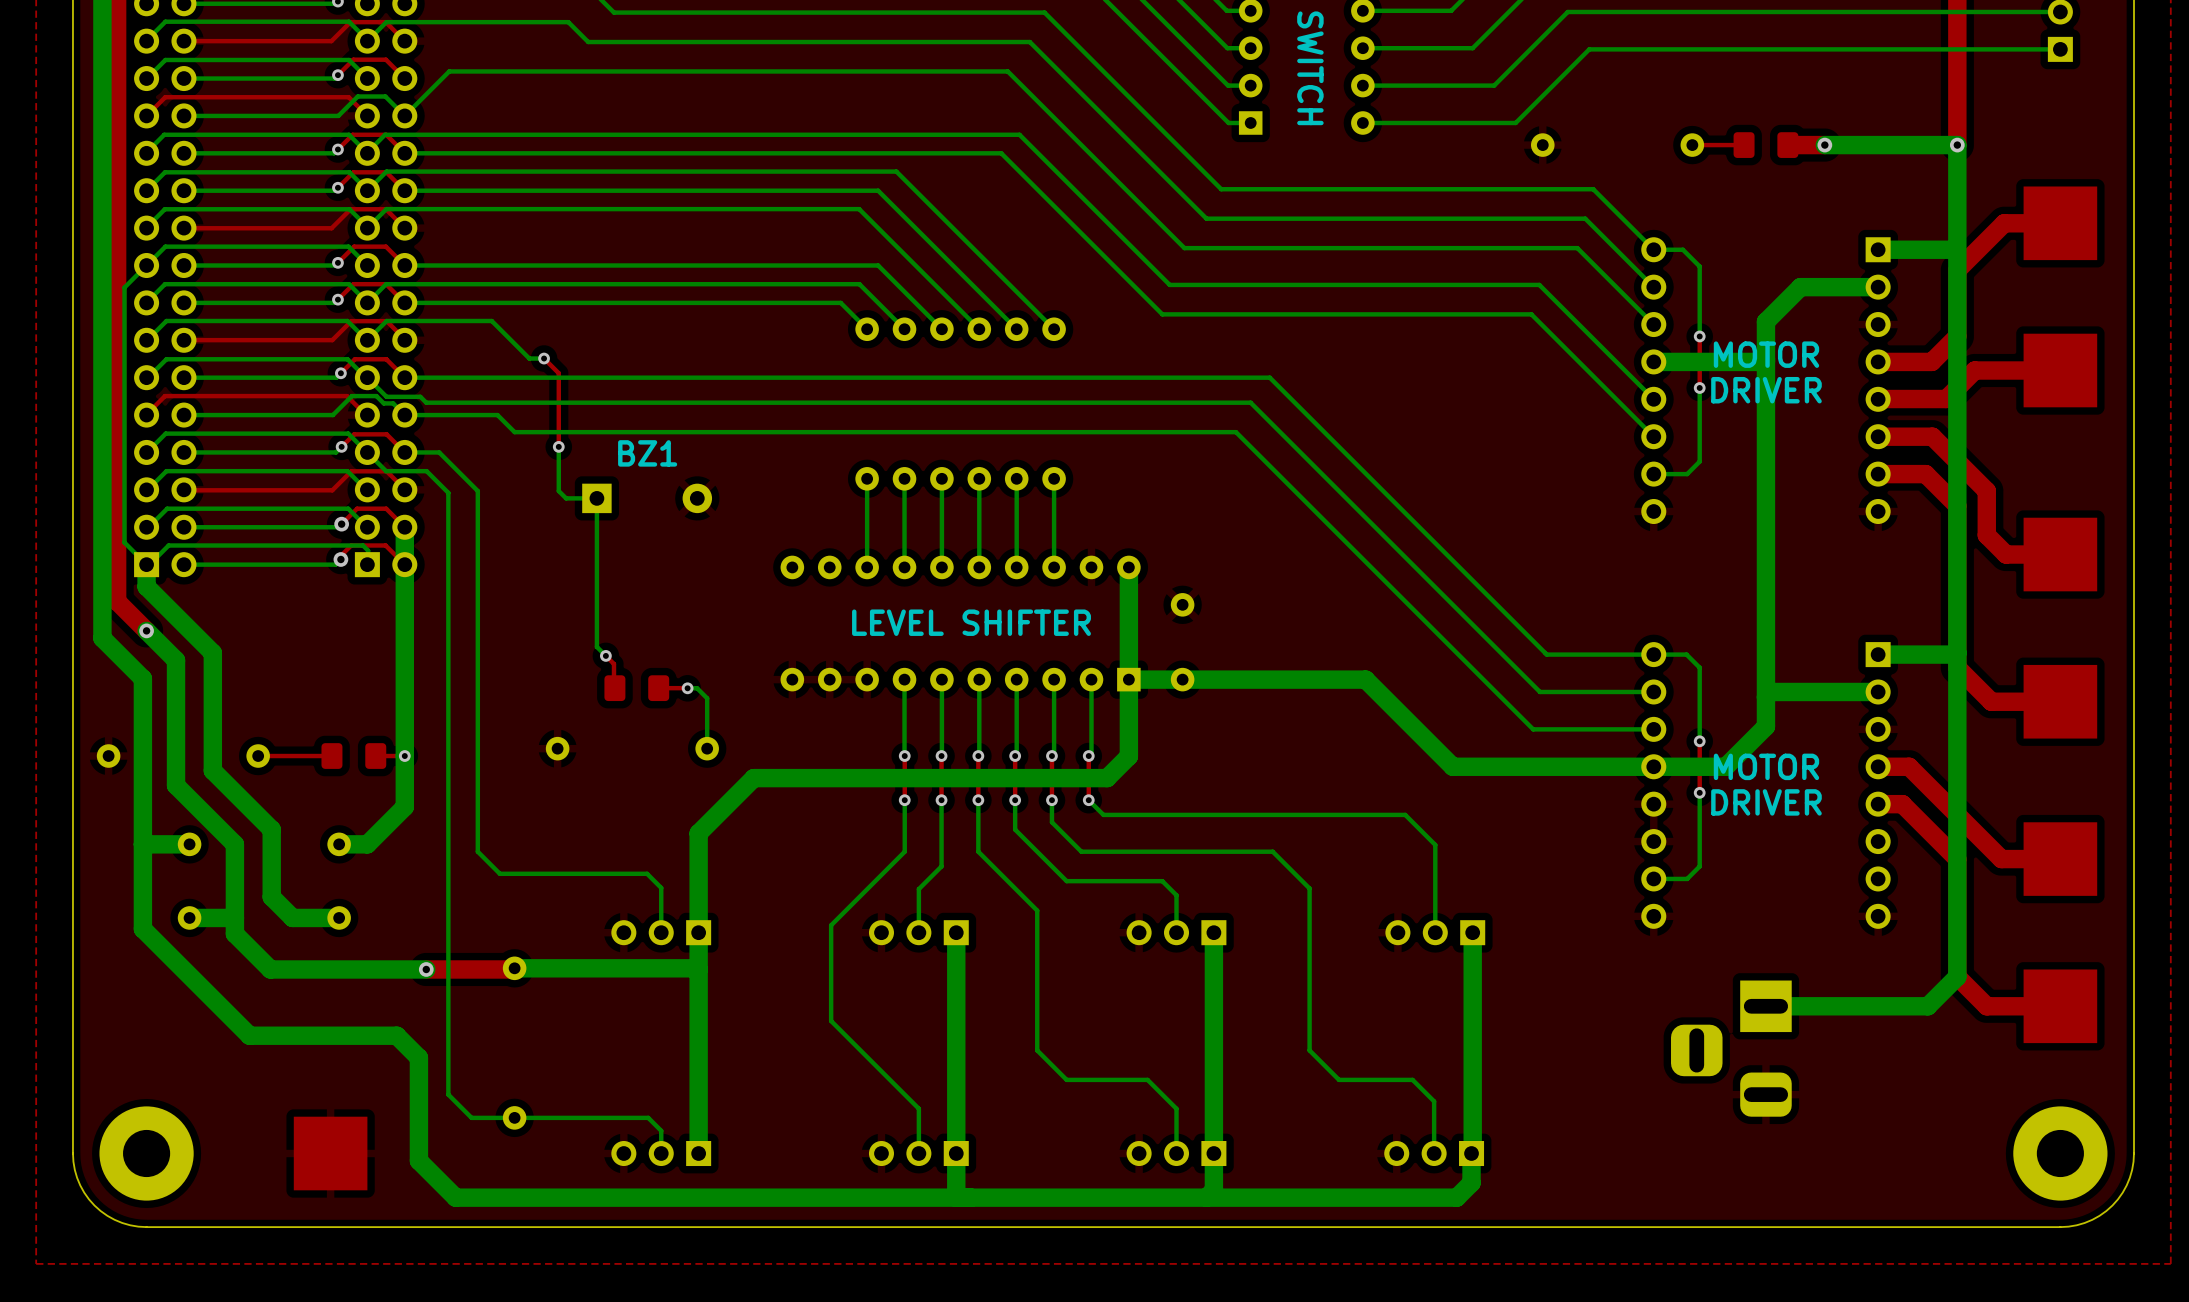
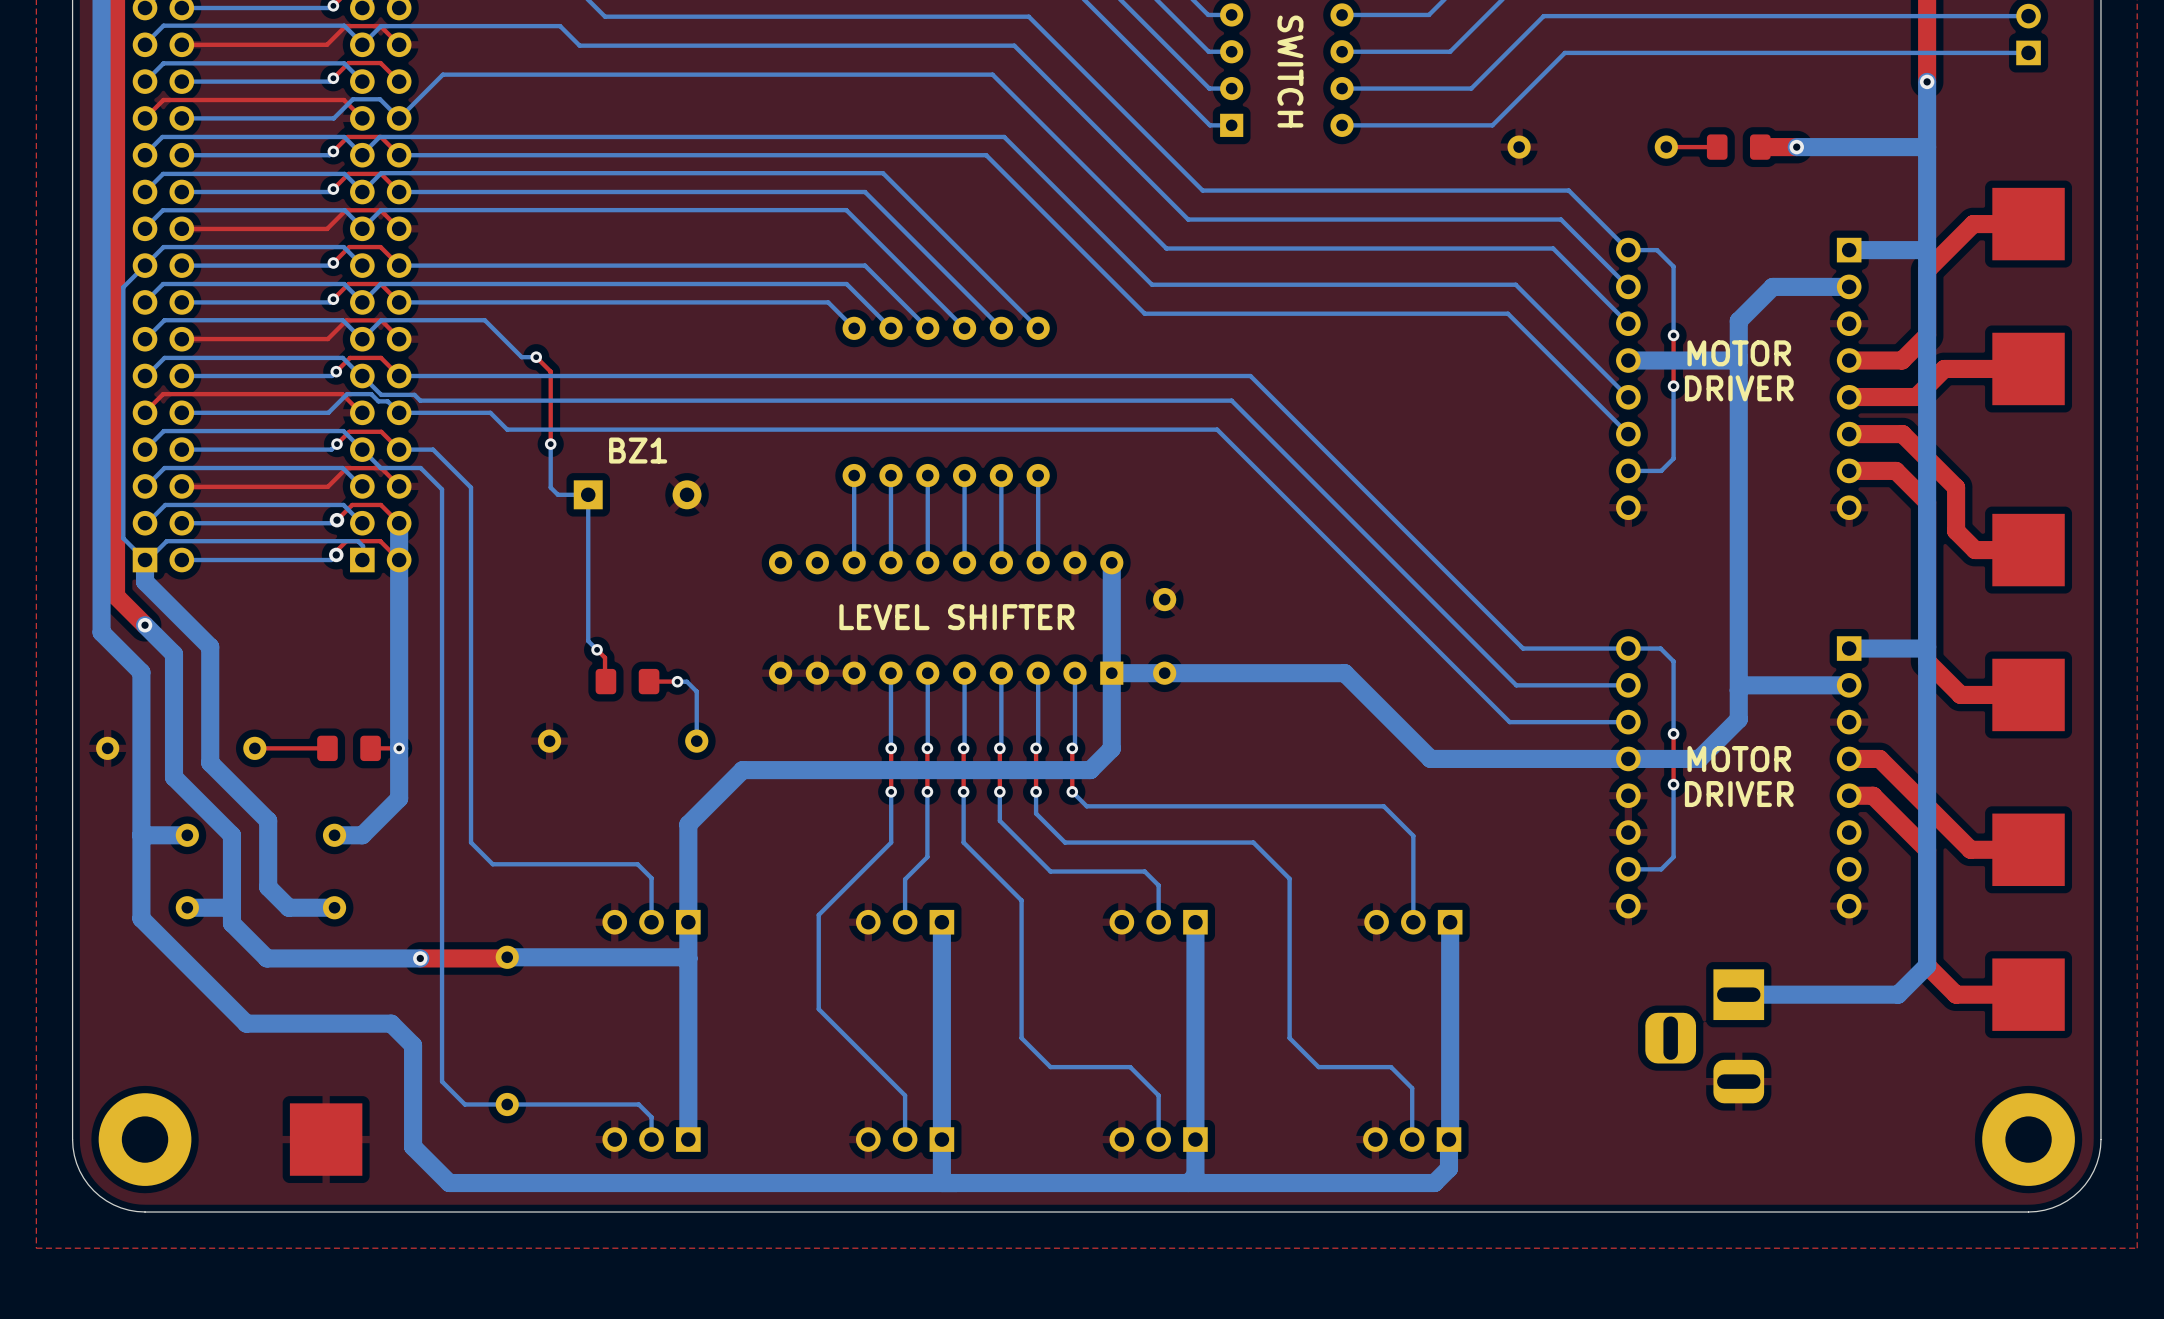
top track: (1957, 78) (1957, 145) -> none
bottom track: none -> (1927, 81) (1927, 147)
via position: (1957, 145) -> (1927, 81)

